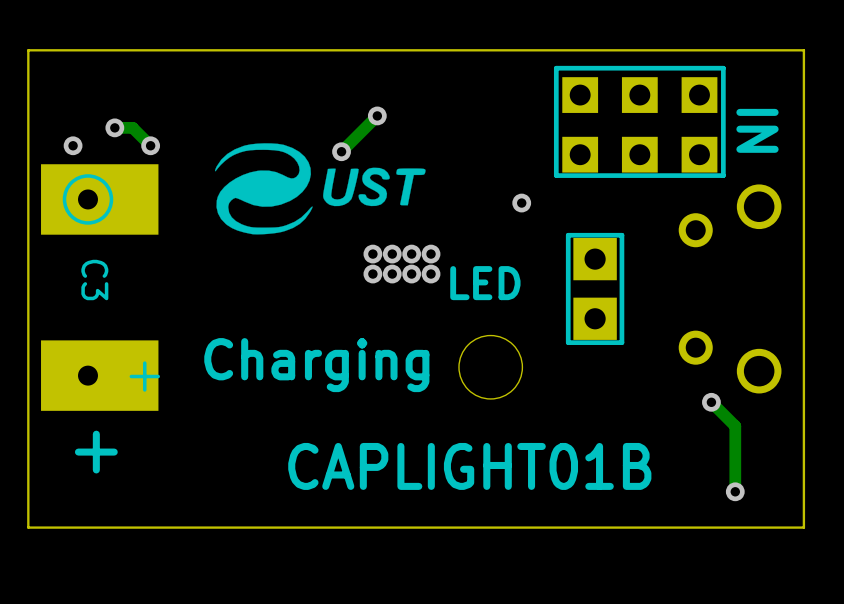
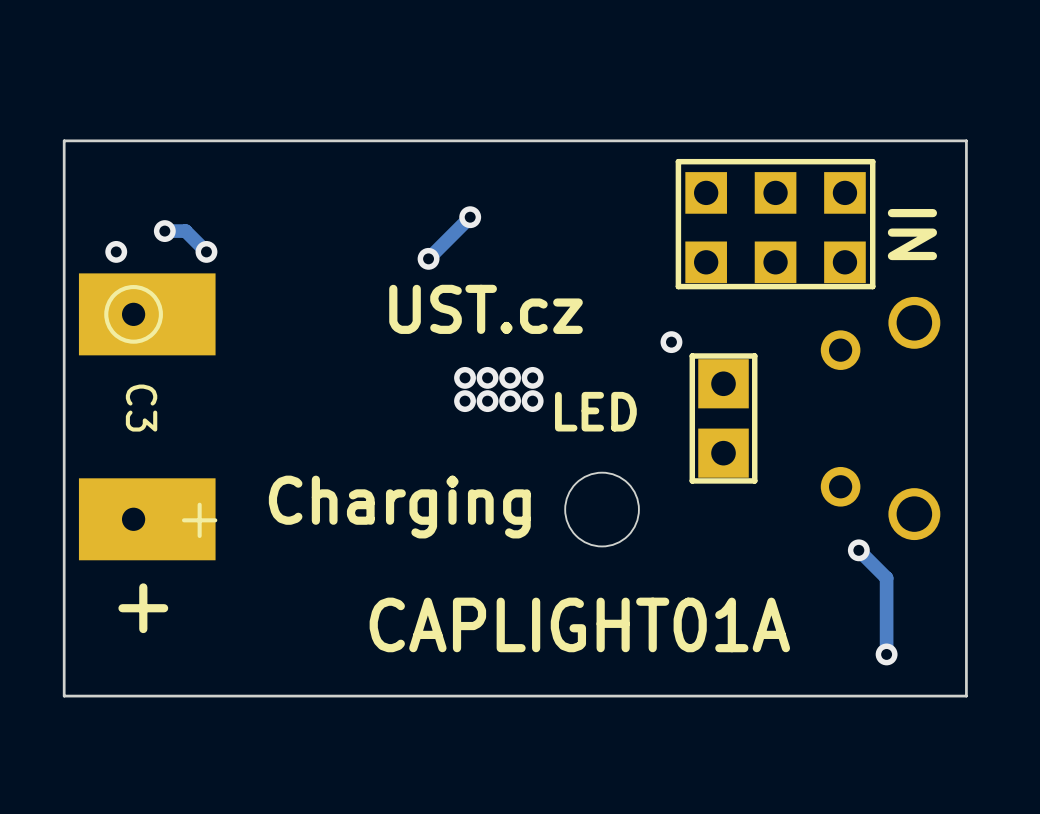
drawing: [214, 143, 426, 235] -> none
text: none -> UST.cz (486, 309)
via position: (521, 203) -> (671, 342)
text: CAPLIGHT01B (469, 466) -> CAPLIGHT01A (579, 624)

